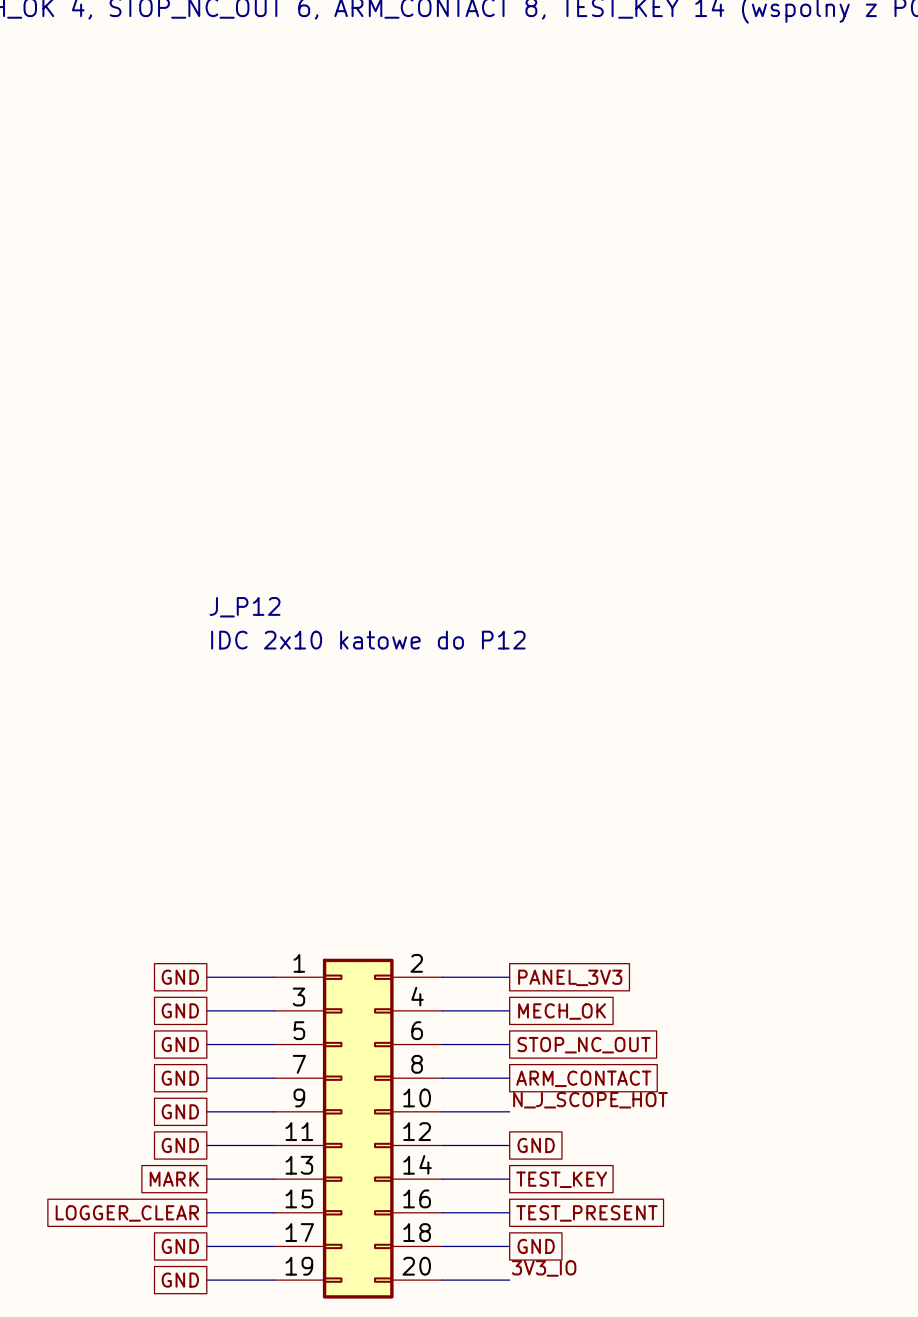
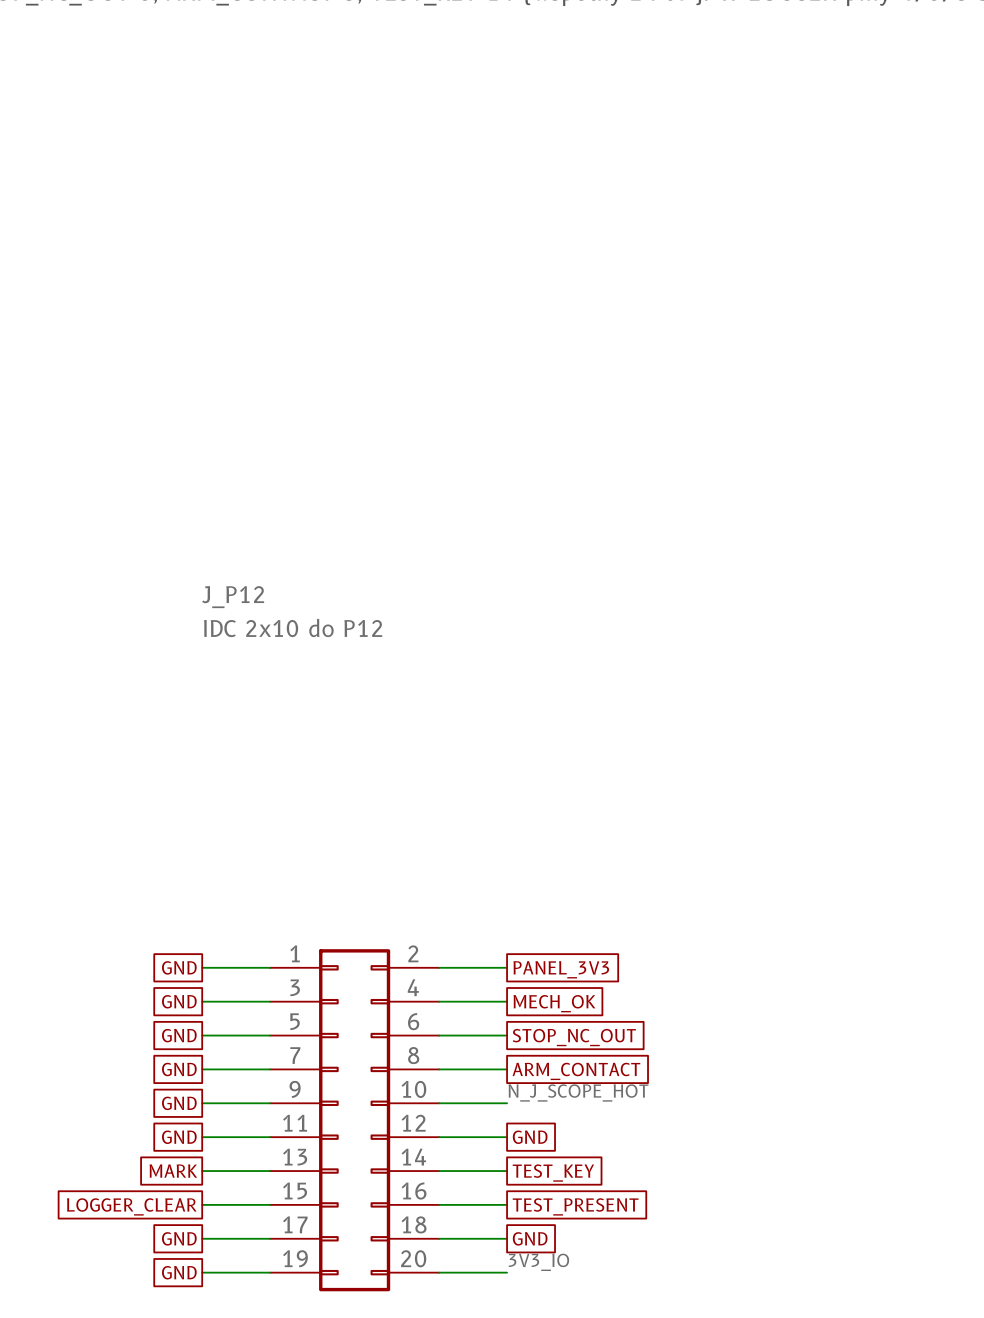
J_P12 value: IDC 2x10 katowe do P12 (368, 640) -> IDC 2x10 do P12 (293, 627)

